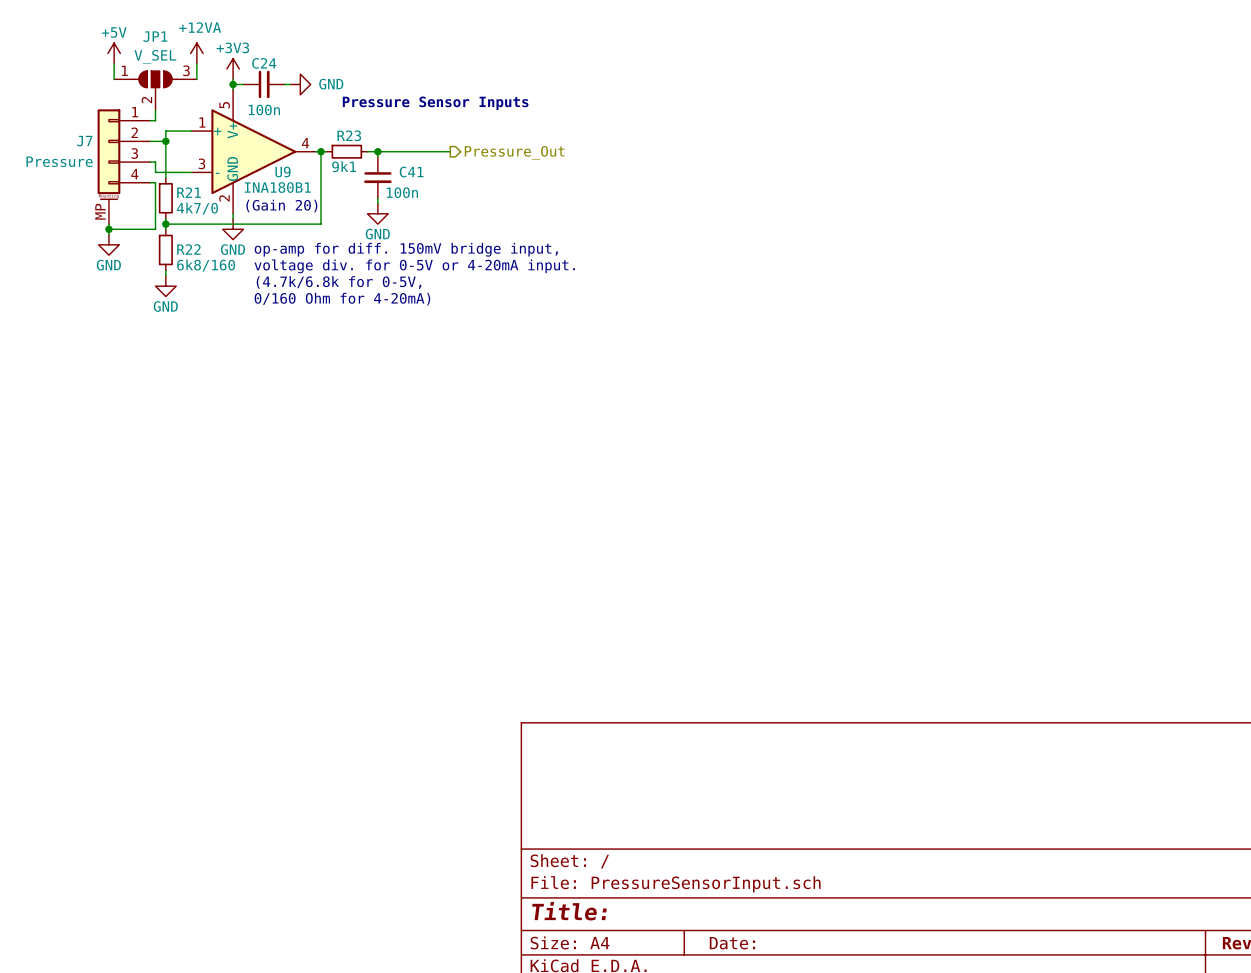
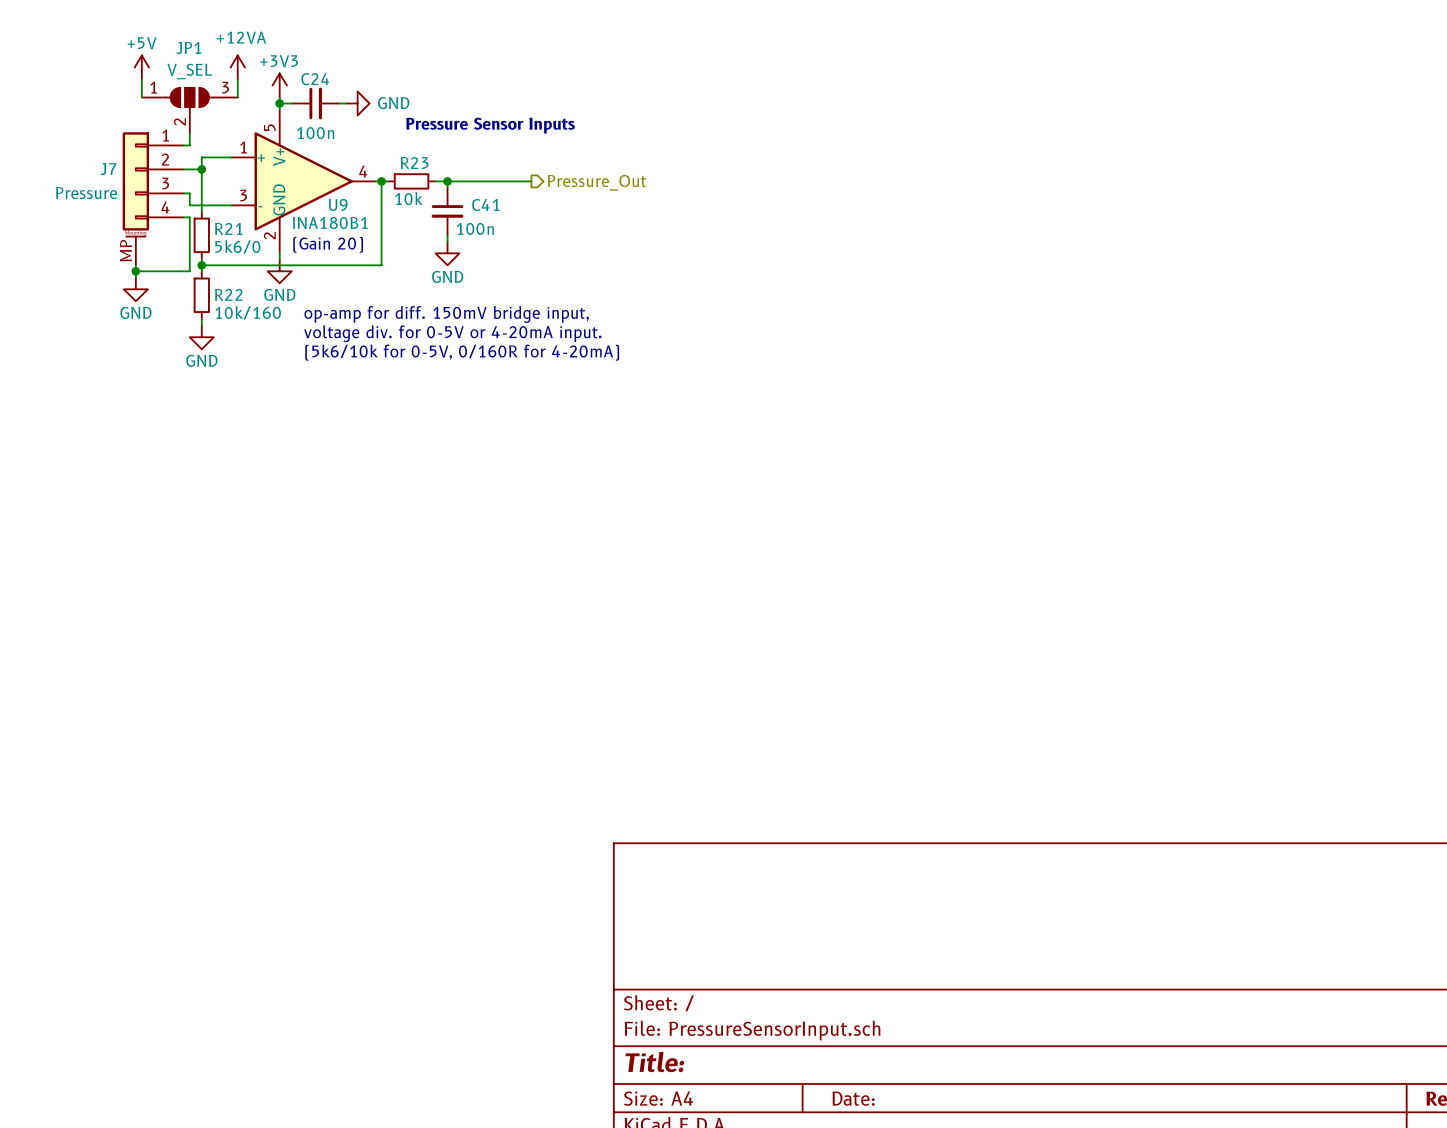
R23 value: 9k1 (344, 166) -> 10k (408, 198)
R21 value: 4k7/0 (197, 208) -> 5k6/0 (237, 246)
text: op-amp for diff. 150mV bridge input, (406, 249) -> none
R22 value: 6k8/160 (206, 265) -> 10k/160 (248, 312)
text: voltage div. for 0-5V or 4-20mA input. (414, 266) -> op-amp for diff. 150mV bridge input, (446, 314)
text: (4.7k/6.8k for 0-5V, (339, 282) -> voltage div. for 0-5V or 4-20mA input. (452, 333)
text: 0/160 Ohm for 4-20mA) (342, 299) -> (5k6/10k for 0-5V, 0/160R for 4-20mA) (462, 352)

